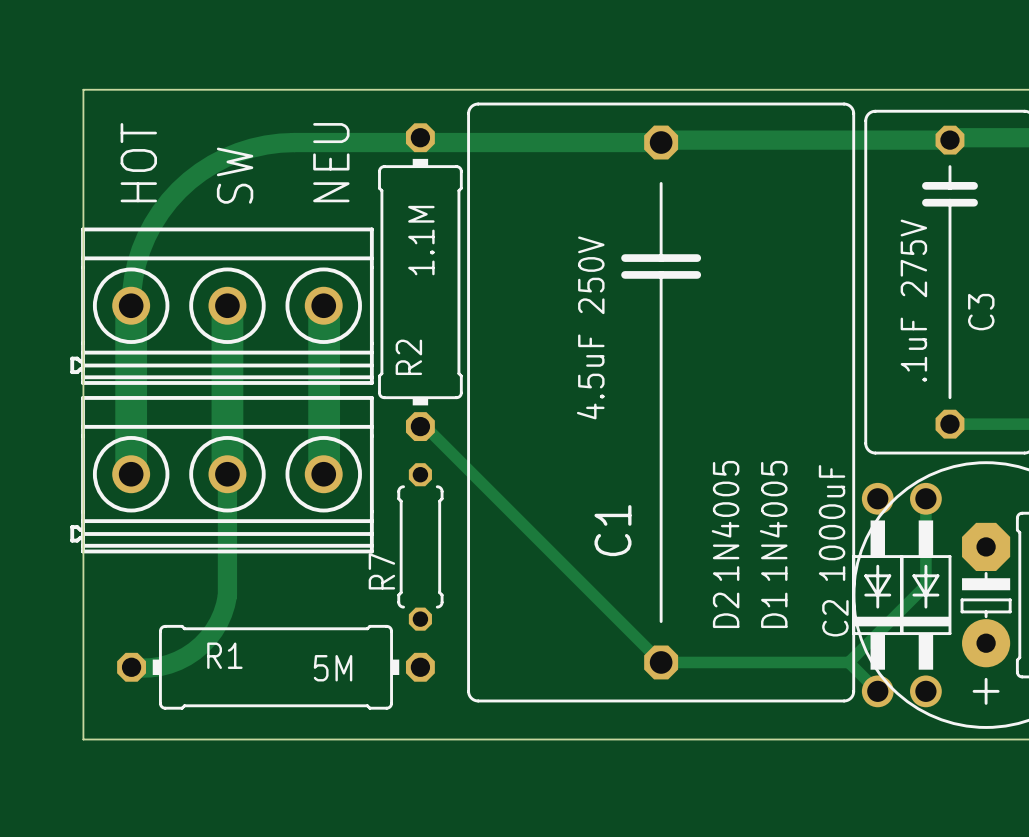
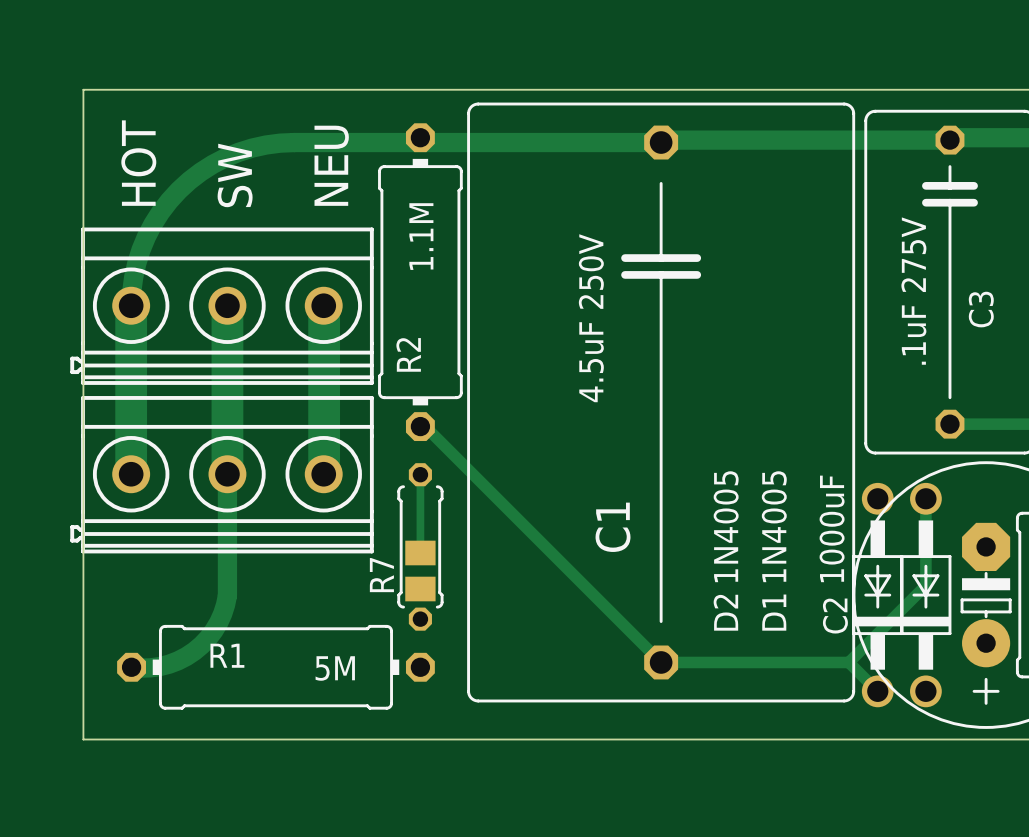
track: none -> (420, 474) (420, 552)
part: none -> (420, 571)

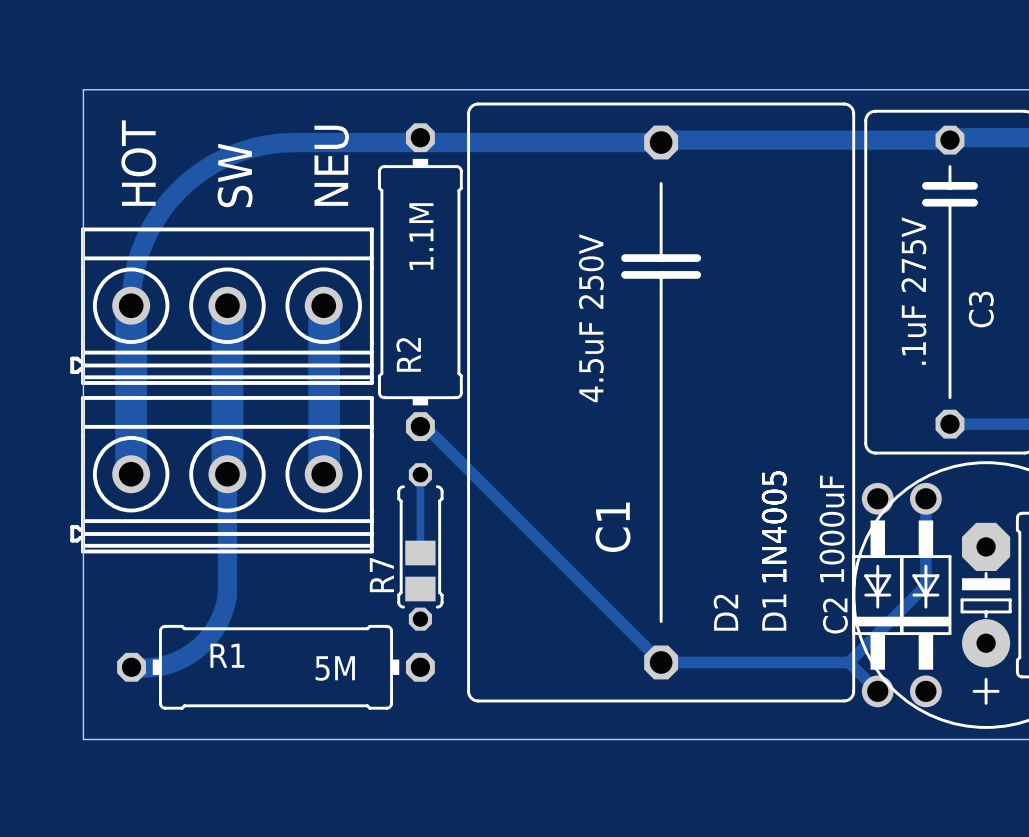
D2 value position: 1N4005 (726, 526) -> 1N4005 (774, 526)

